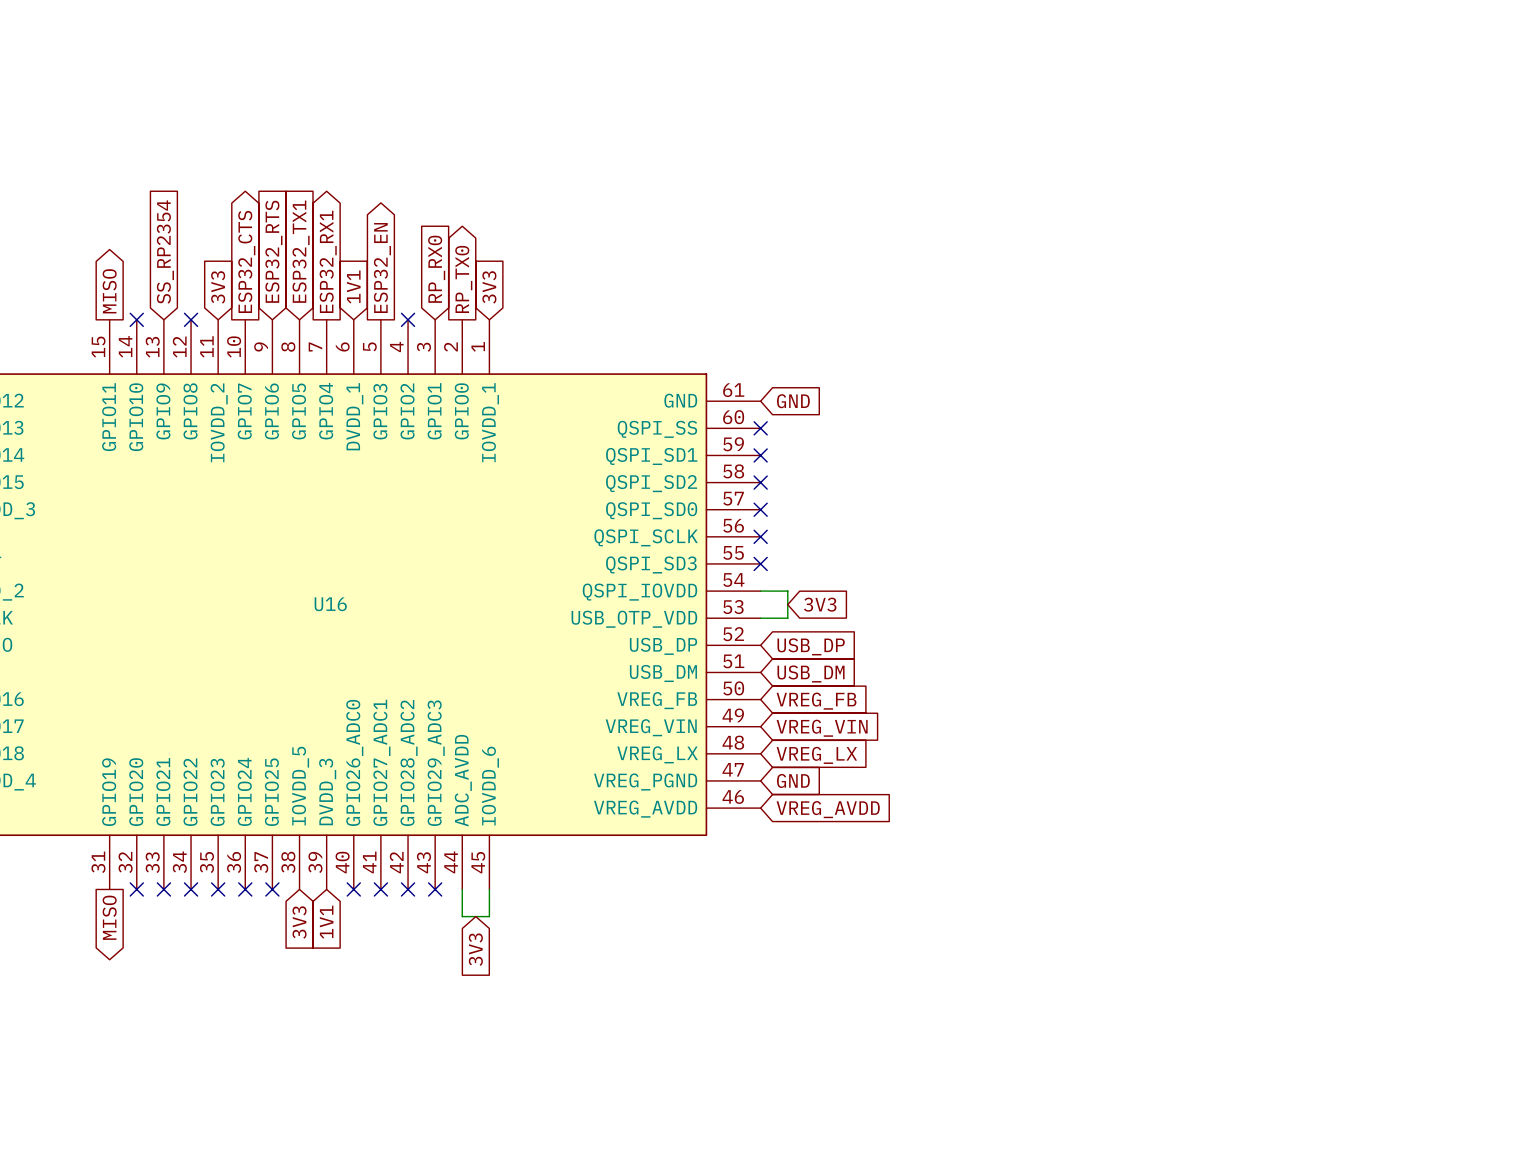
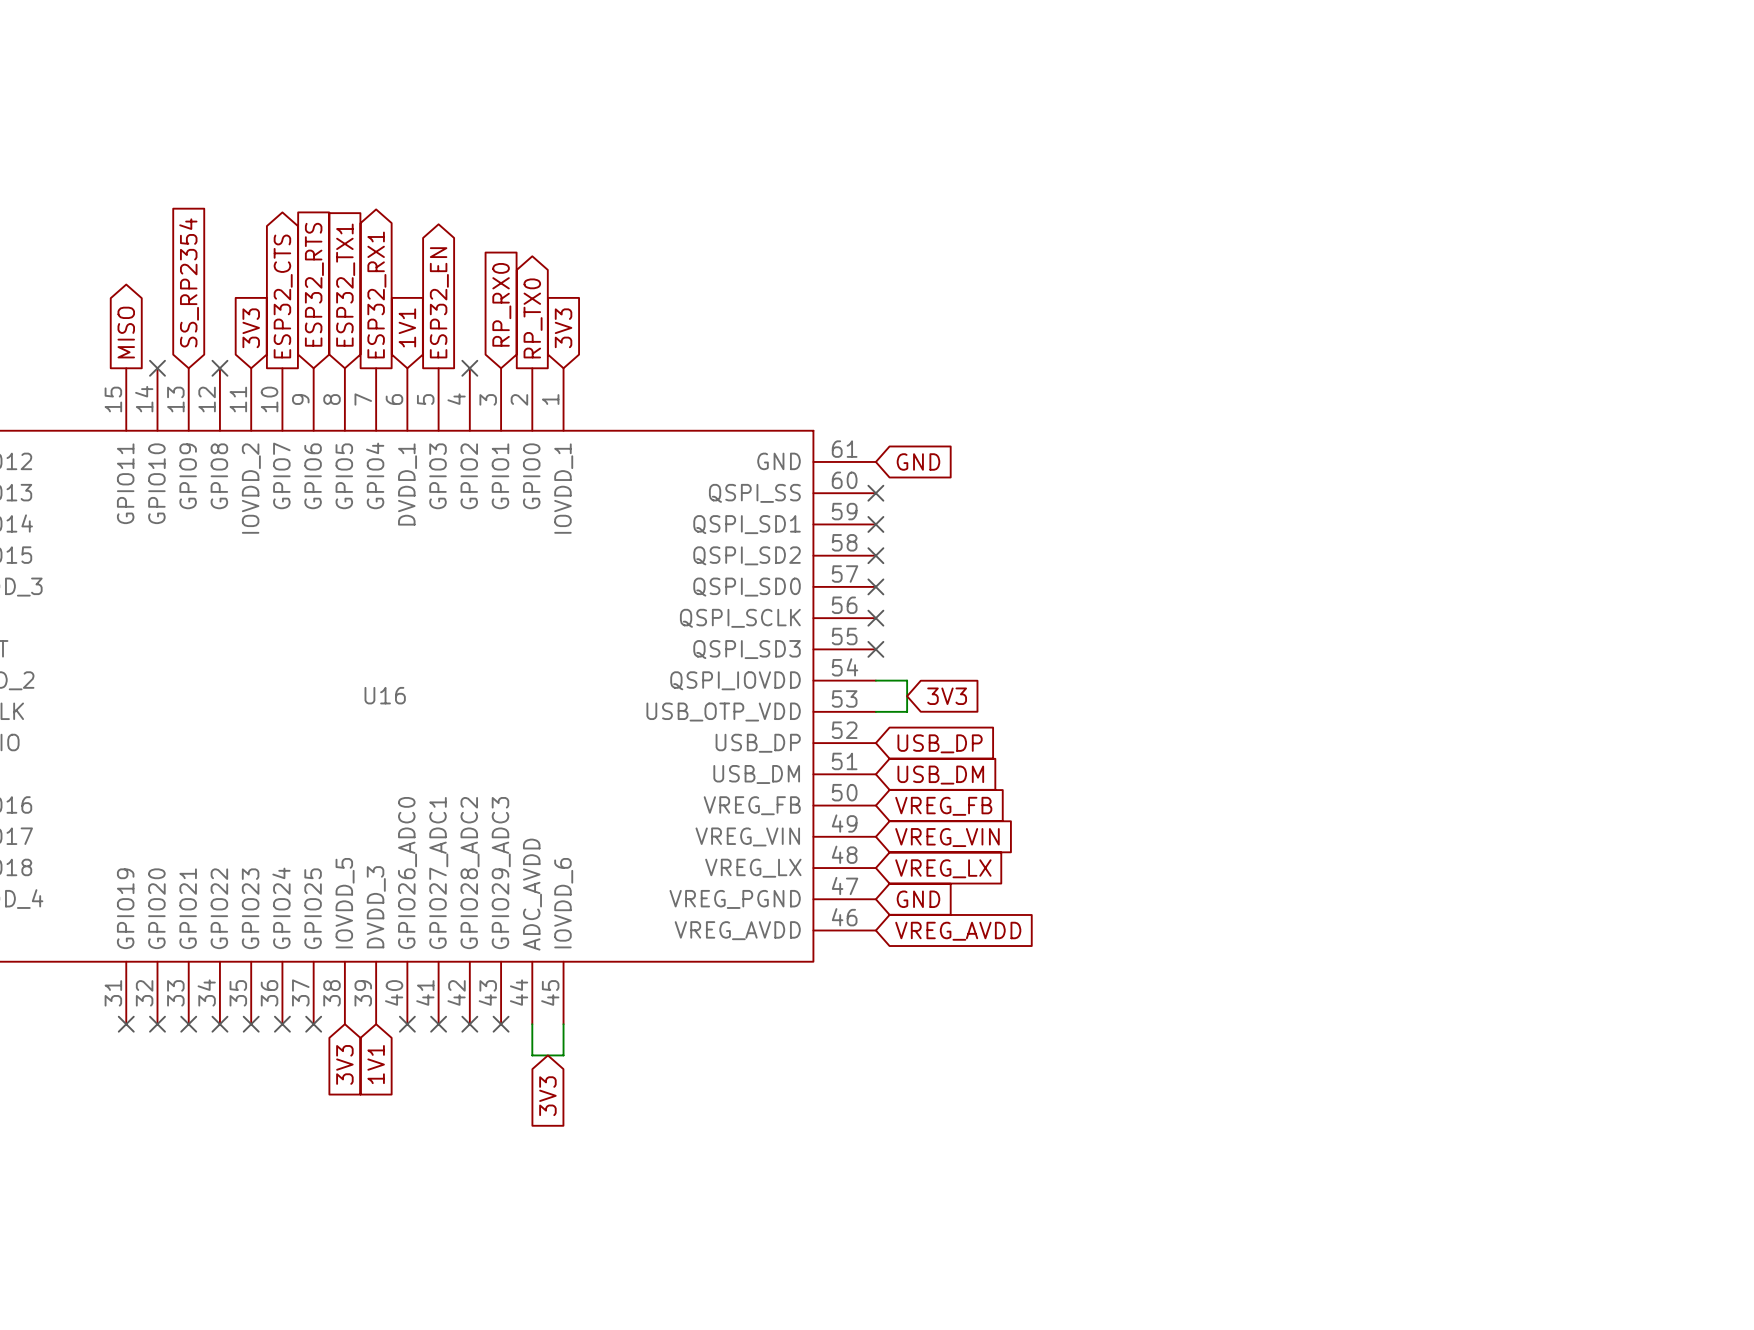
no-connect mark: none -> (126, 1024)
global label: MISO (109, 917) -> none

